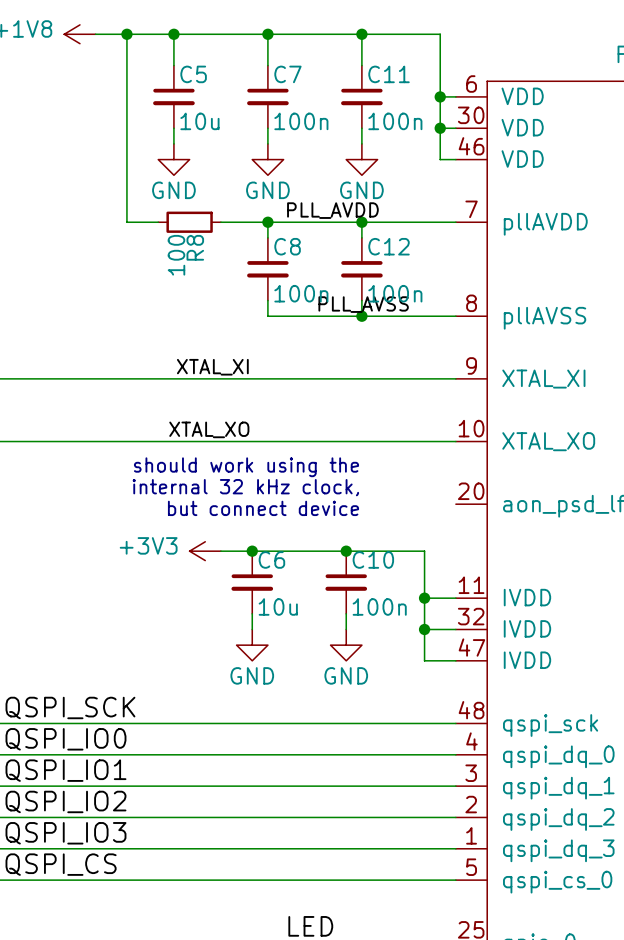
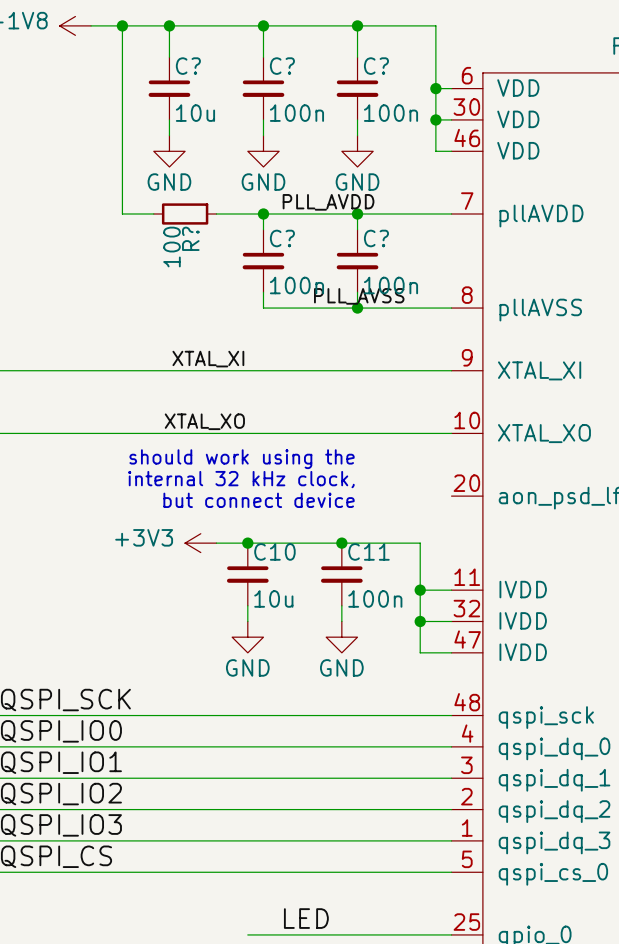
C5 name: C5 (193, 74) -> C? (188, 66)
C7 name: C7 (287, 74) -> C? (282, 66)
C11 name: C11 (389, 74) -> C? (376, 66)
C8 name: C8 (287, 246) -> C? (282, 238)
C12 name: C12 (389, 246) -> C? (376, 238)
R8 name: R8 (195, 247) -> R? (190, 238)
C6 name: C6 (271, 559) -> C10 (274, 551)
C10 name: C10 (373, 559) -> C11 (368, 551)

